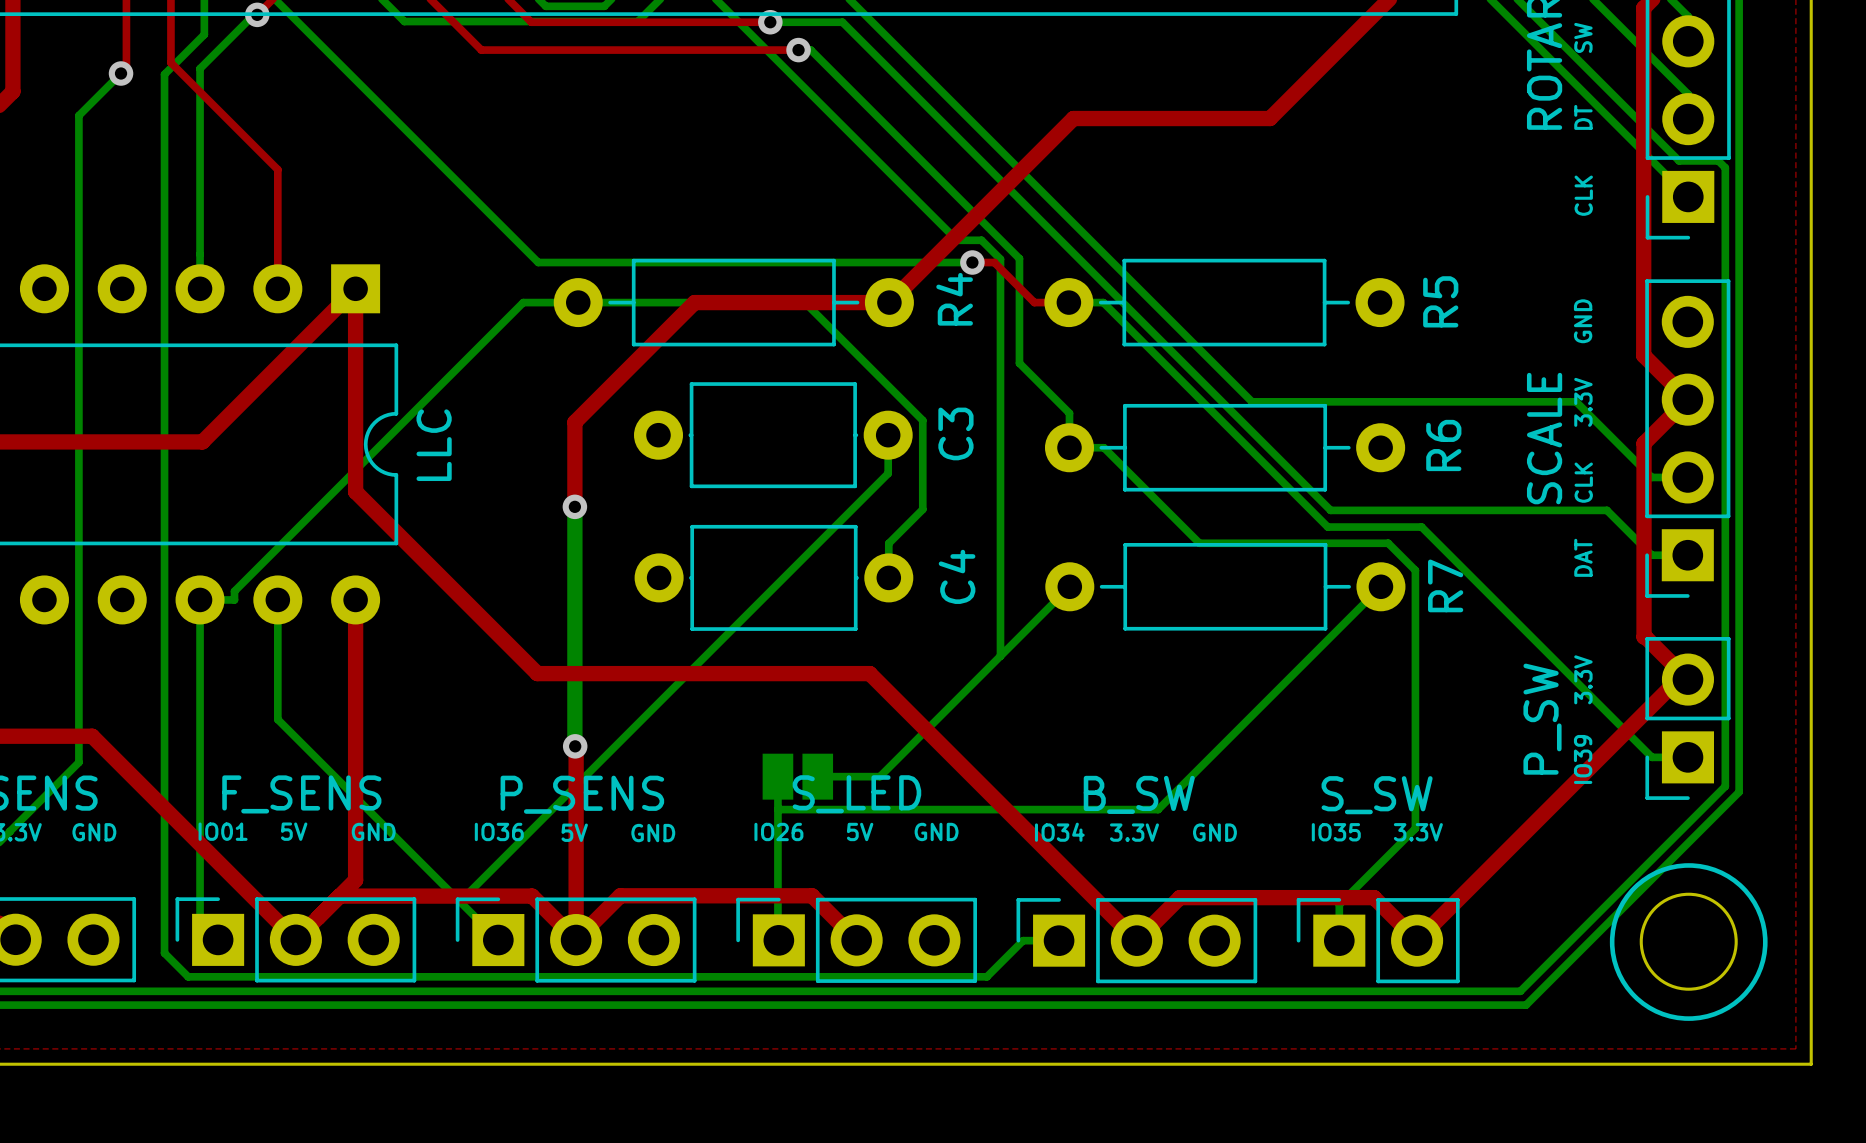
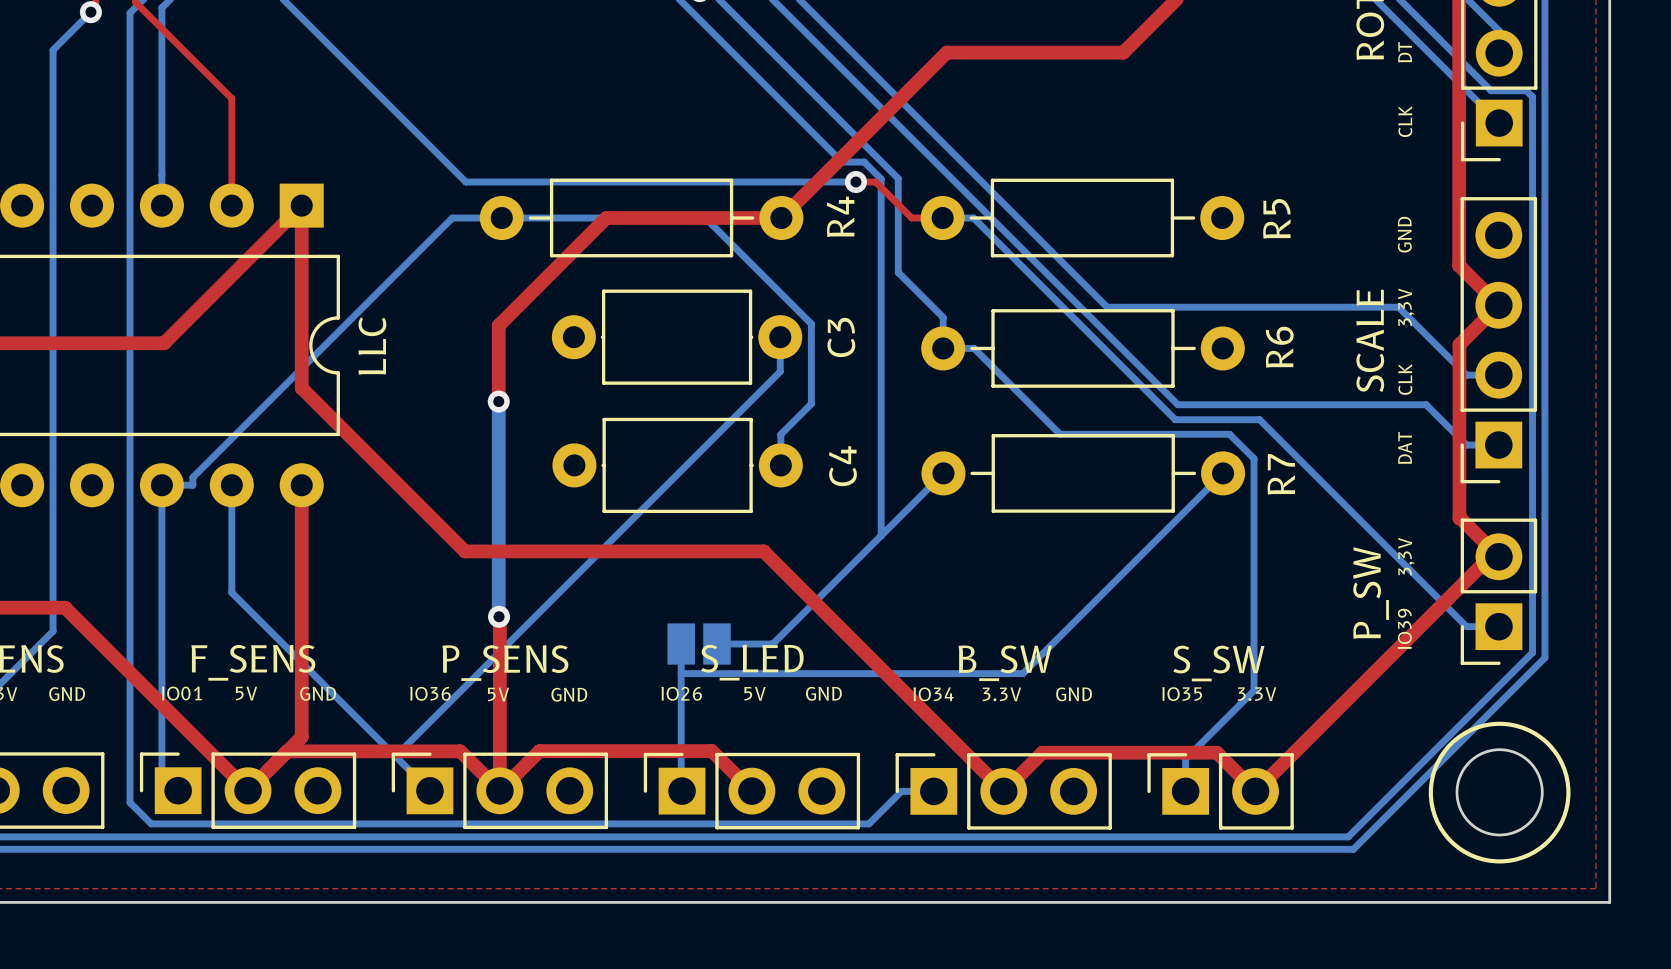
text: 3.3V (1583, 402) -> 3,3V (1406, 307)
text: 3.3V (1583, 679) -> 3,3V (1406, 556)

